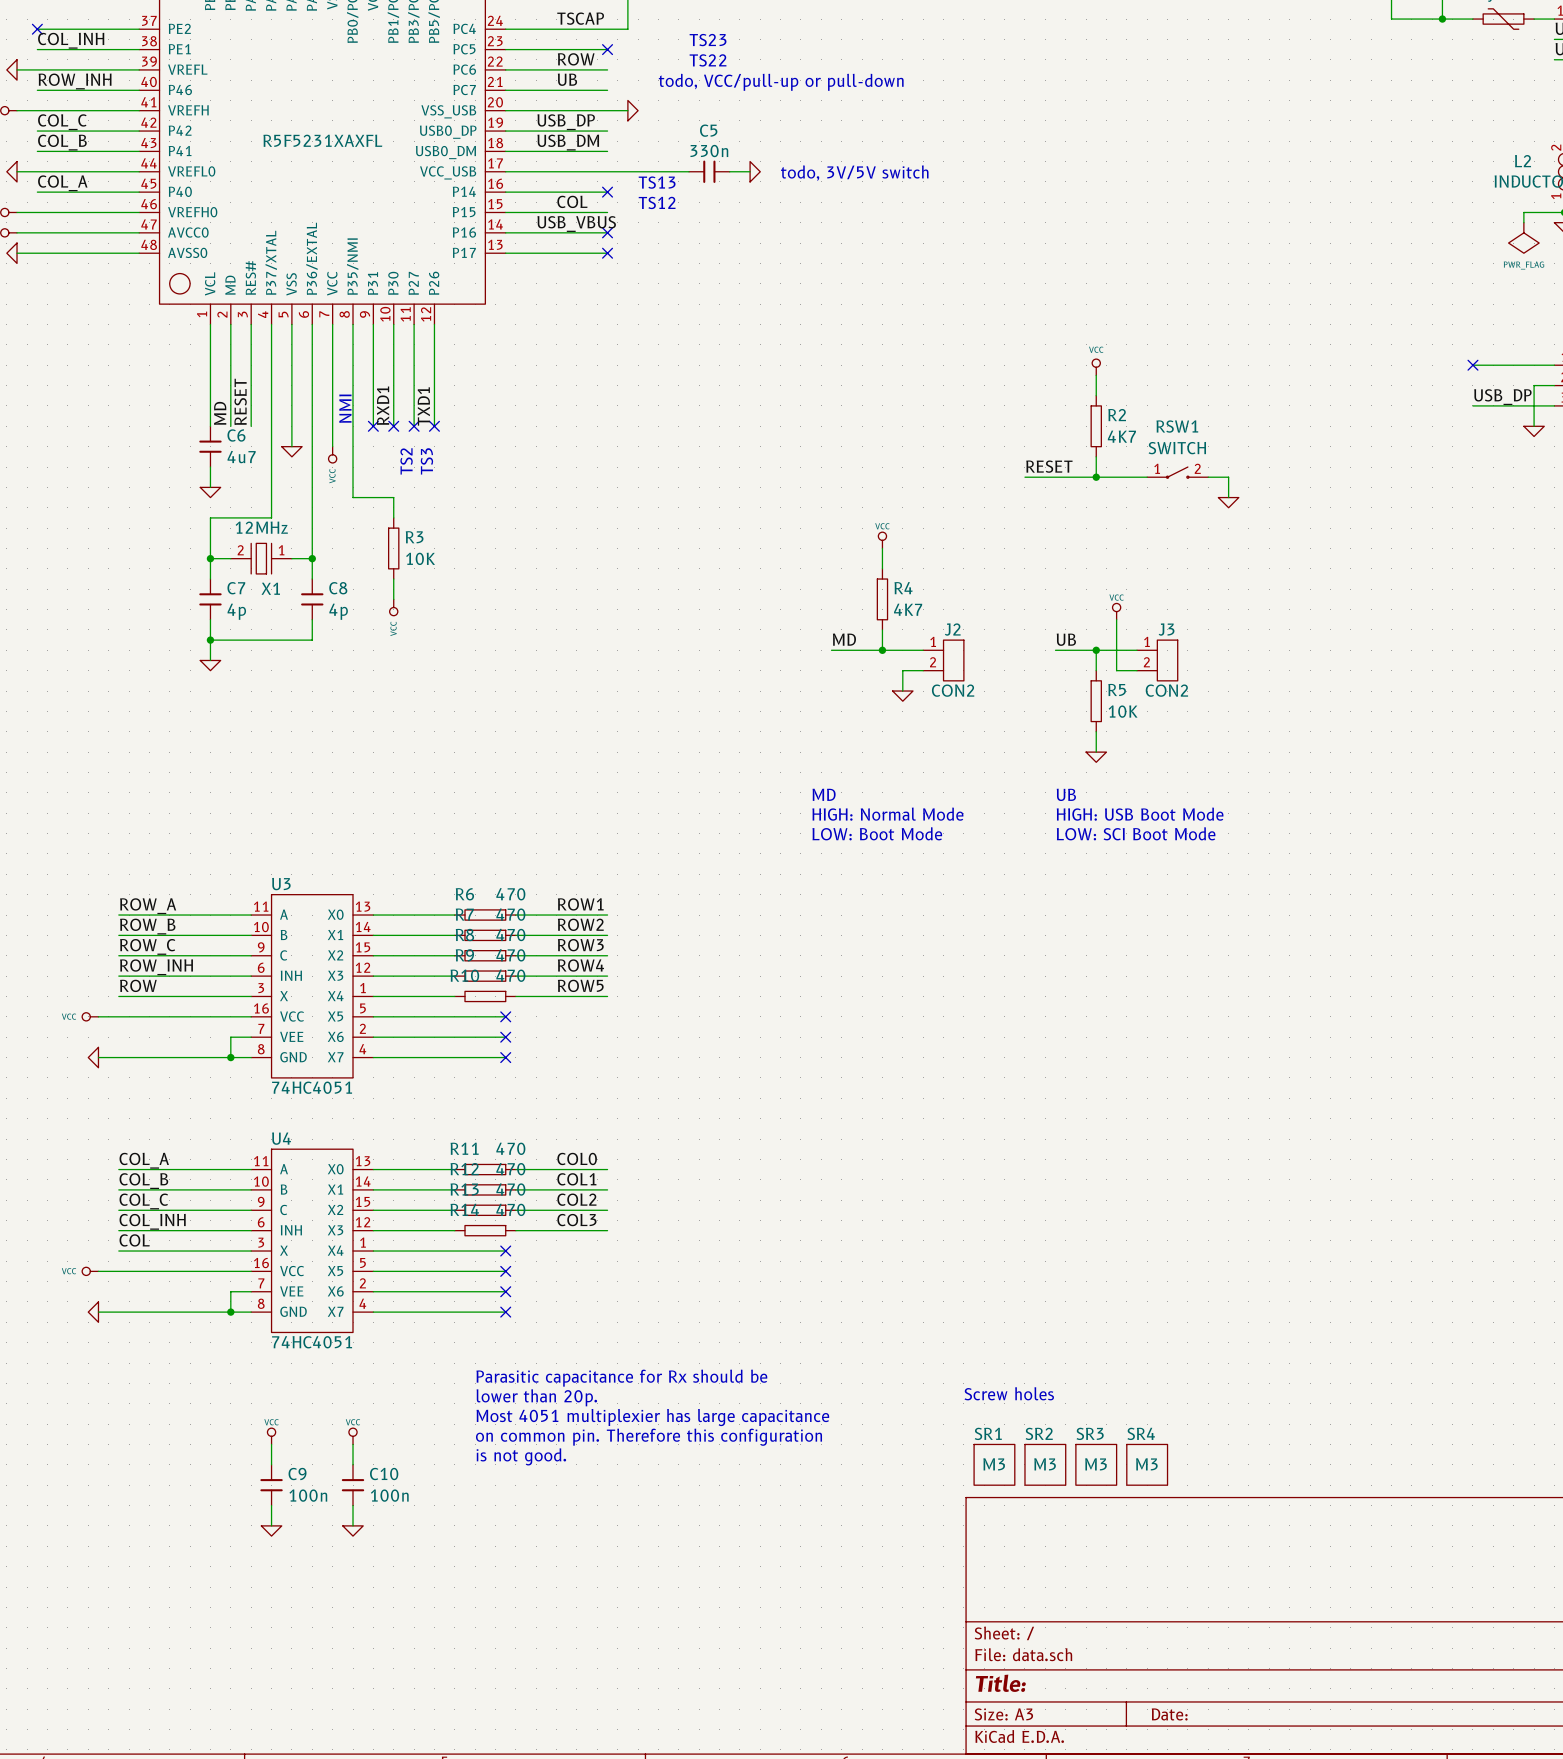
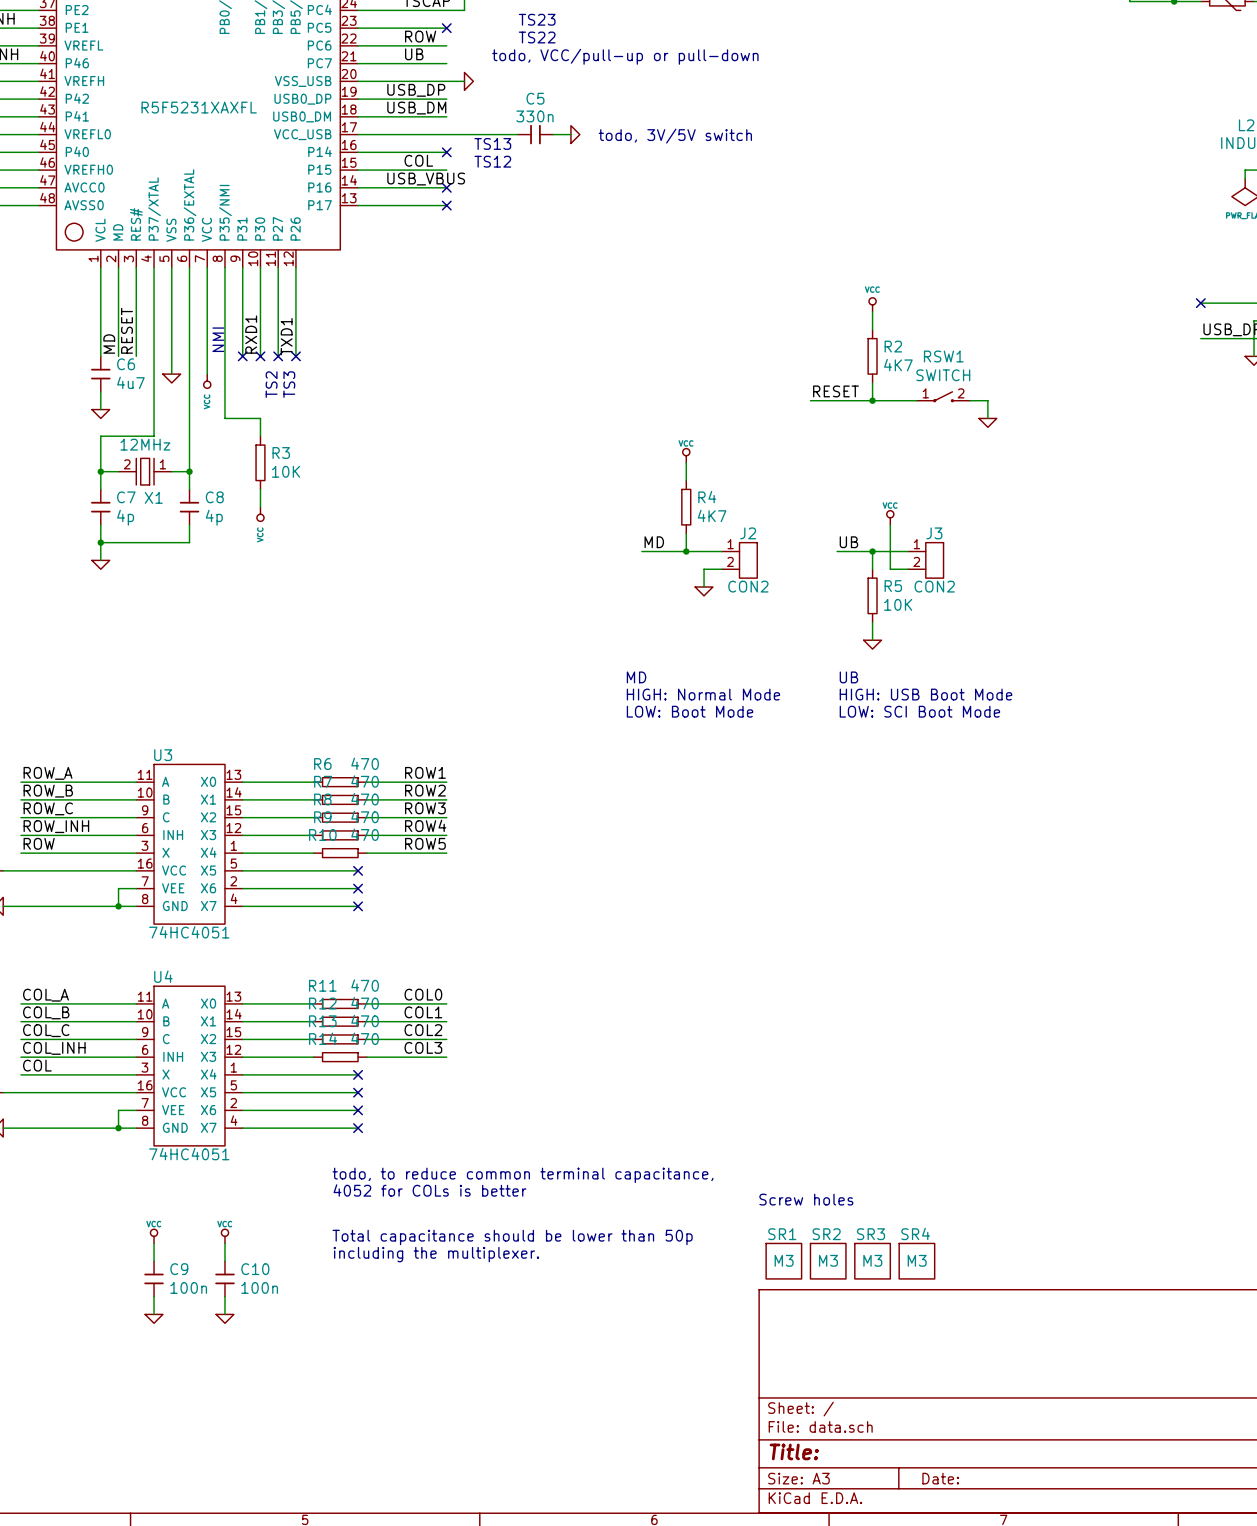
text: none -> todo, to reduce common terminal capacitance, (522, 1175)
text: Parasitic capacitance for Rx should be (621, 1378) -> none
text: none -> 4052 for COLs is better (429, 1190)
text: lower than 20p. (536, 1397) -> none
text: Most 4051 multiplexier has large capacitance (652, 1417) -> none
text: on common pin. Therefore this configuration (649, 1437) -> Total capacitance should be lower than 50p (512, 1237)
text: is not good. (521, 1456) -> including the multiplexer. (436, 1254)

